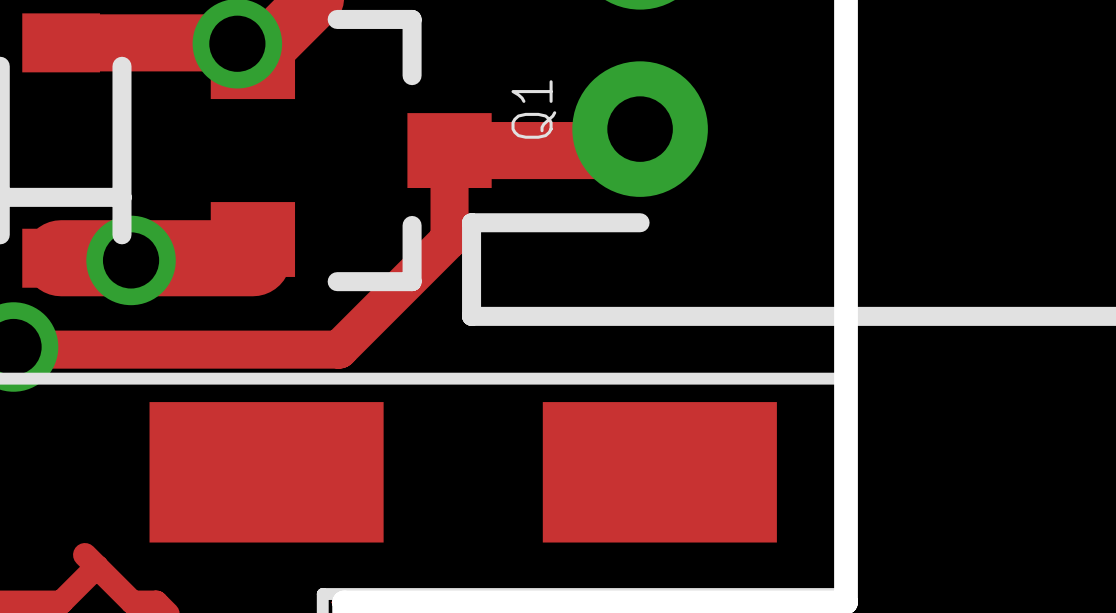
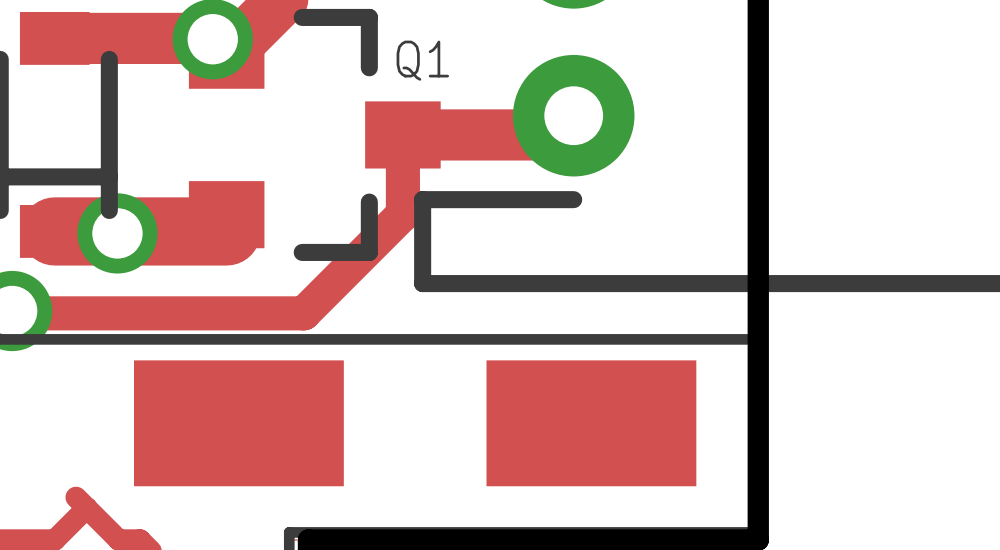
Q1 name rotation: 0° (533, 109) -> 90° clockwise (422, 60)

